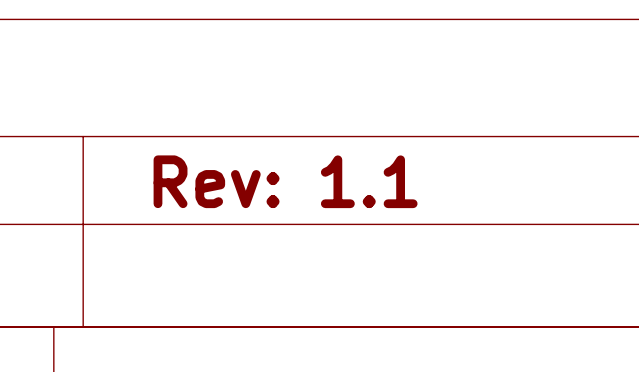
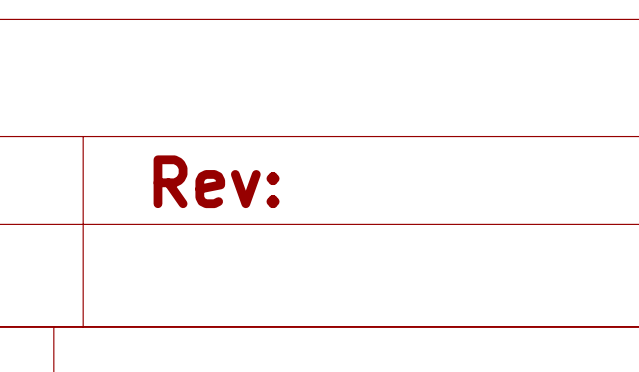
title block: Rev: 1.1 (285, 181) -> Rev: (216, 181)

